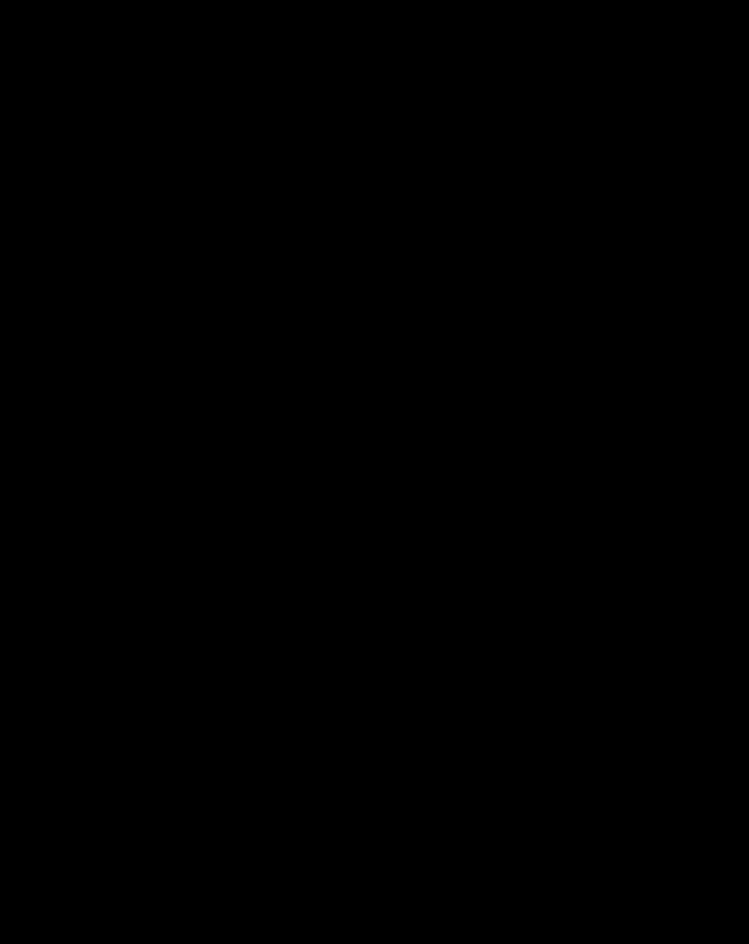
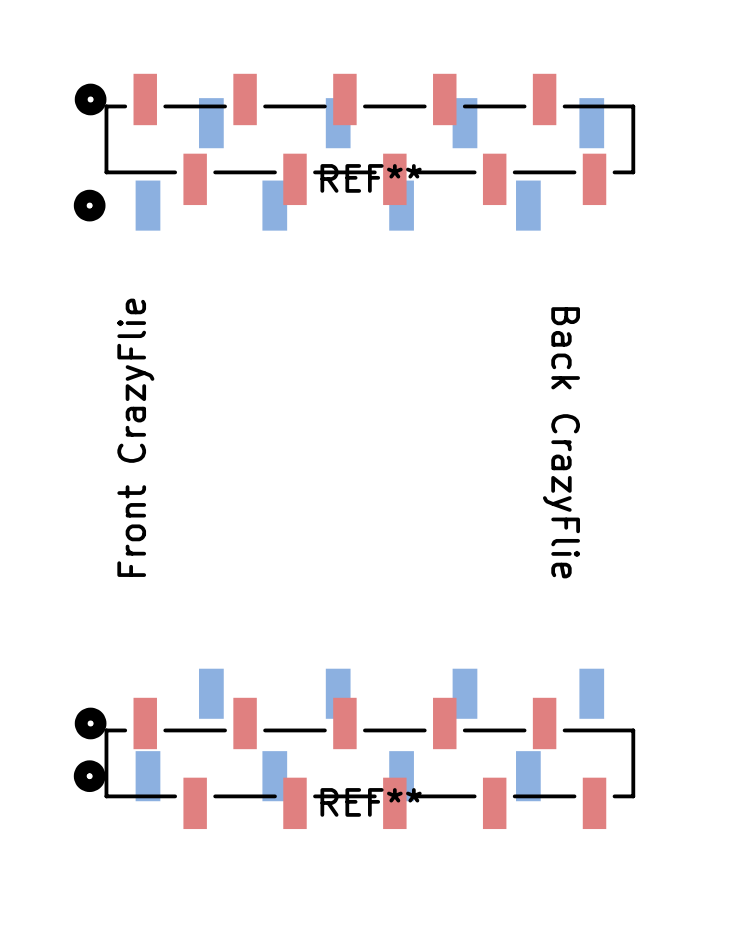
REF**: none -> (354, 139)
part: none -> (338, 164)
text: none -> Front CrazyFlie (135, 437)
text: none -> Back CrazyFlie (561, 442)
part: none -> (338, 734)
REF**: none -> (354, 763)

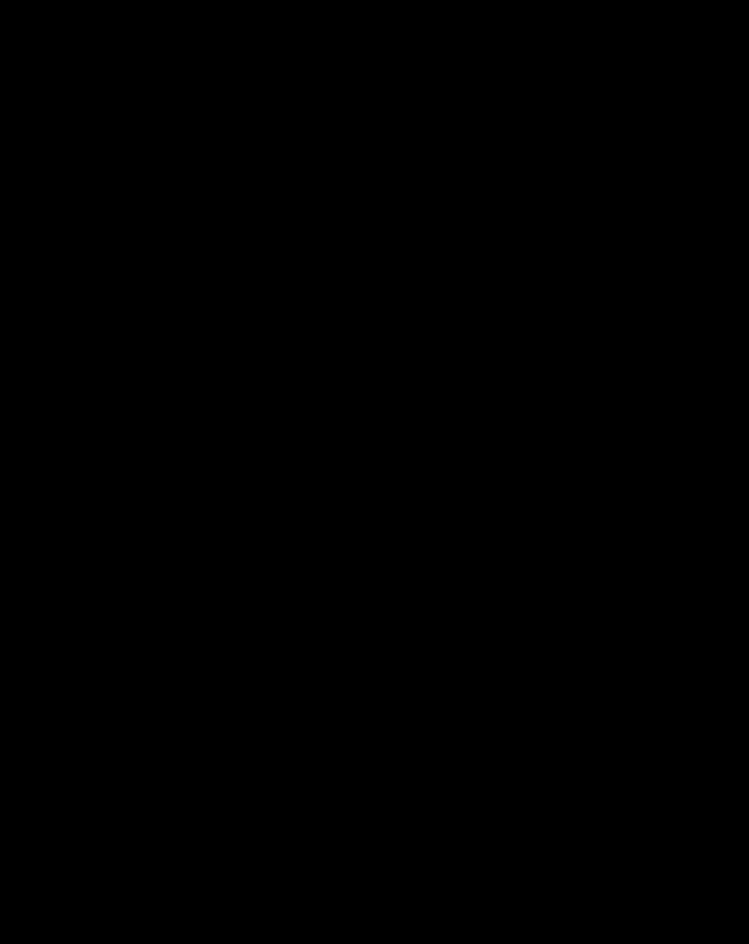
REF**: (354, 139) -> none
part: (338, 164) -> none
text: Front CrazyFlie (135, 437) -> none
text: Back CrazyFlie (561, 442) -> none
part: (338, 734) -> none
REF**: (354, 763) -> none

